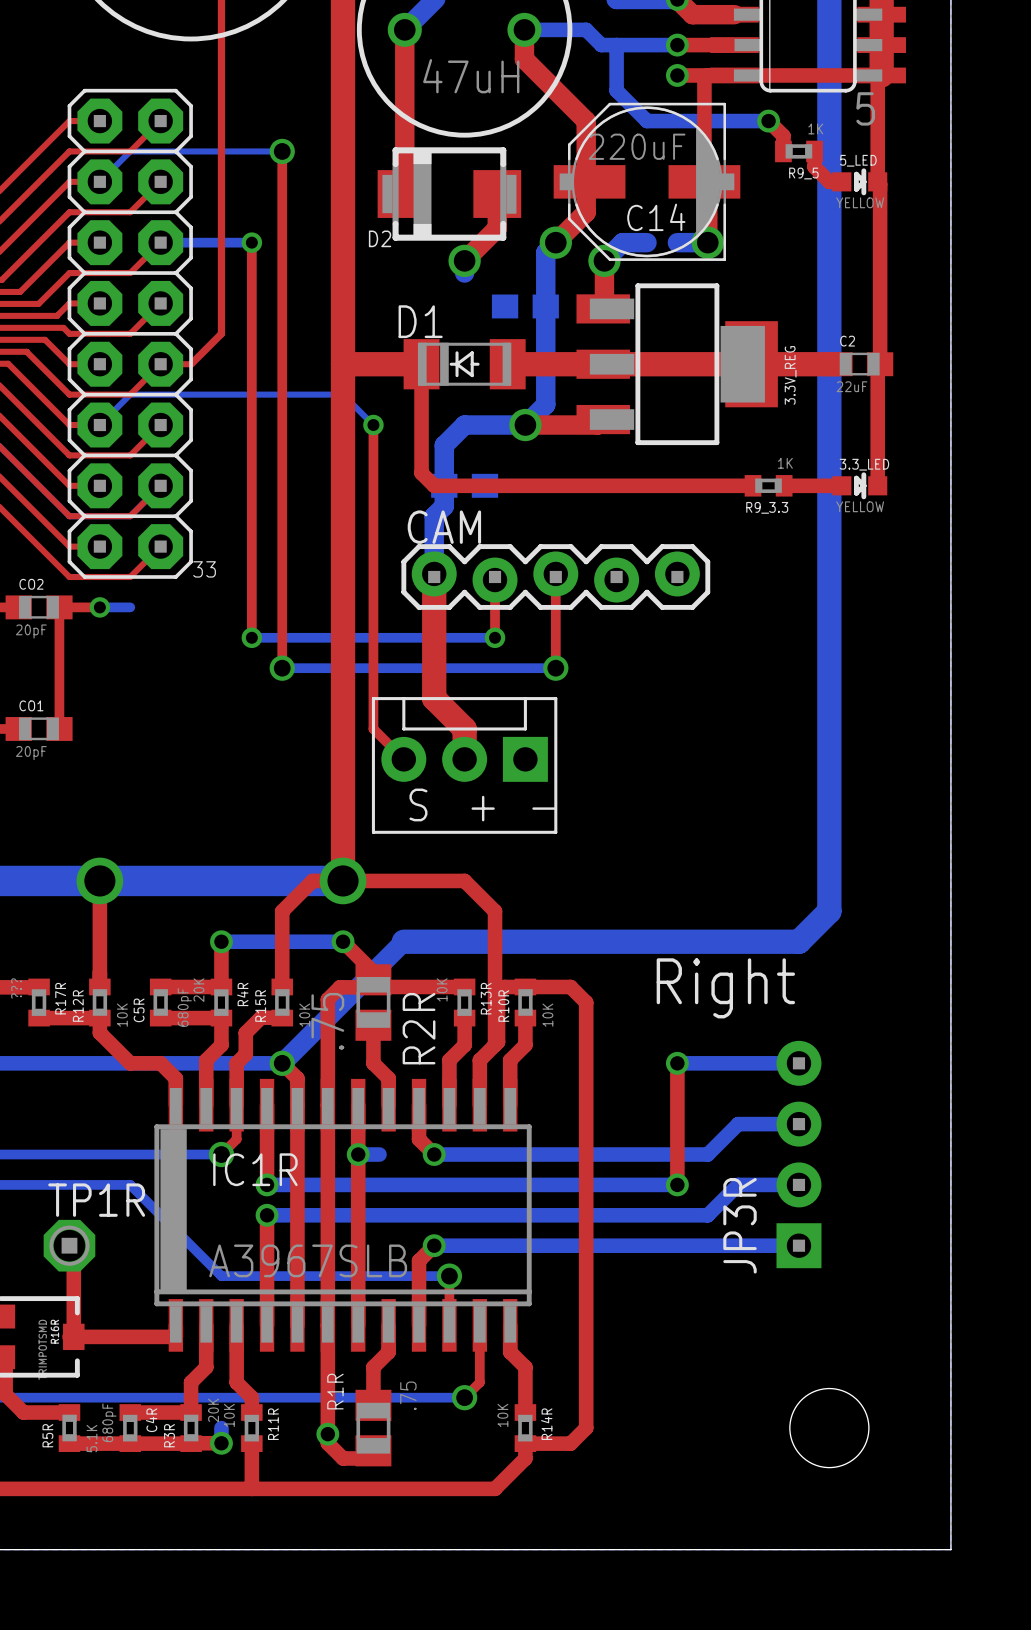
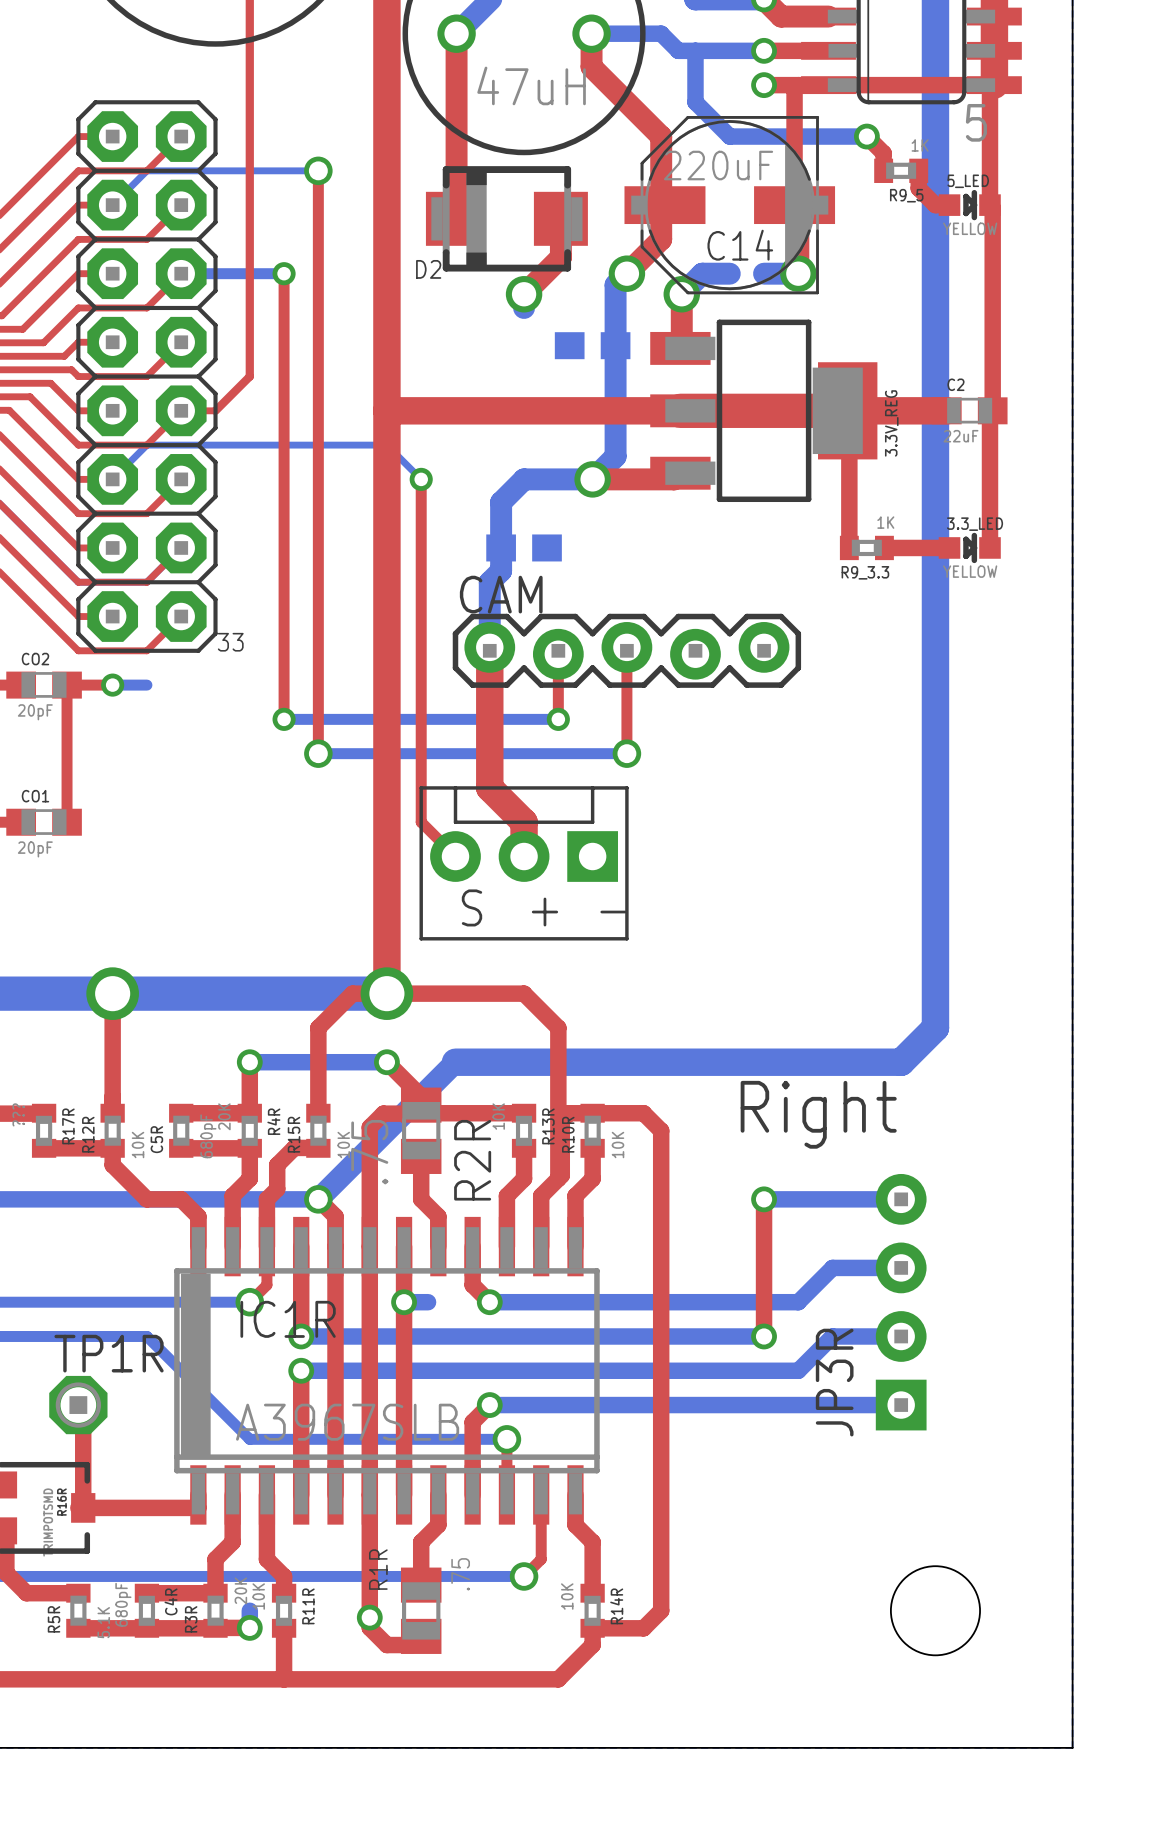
top track: (421, 364) (421, 473) (434, 485) (753, 485) -> (475, 410) (572, 410)
D1: (464, 364) -> none
top track width: thin (603, 364) (751, 364) -> thick (680, 410) (847, 410)
top track: none -> (832, 410) (849, 427) (849, 547)

